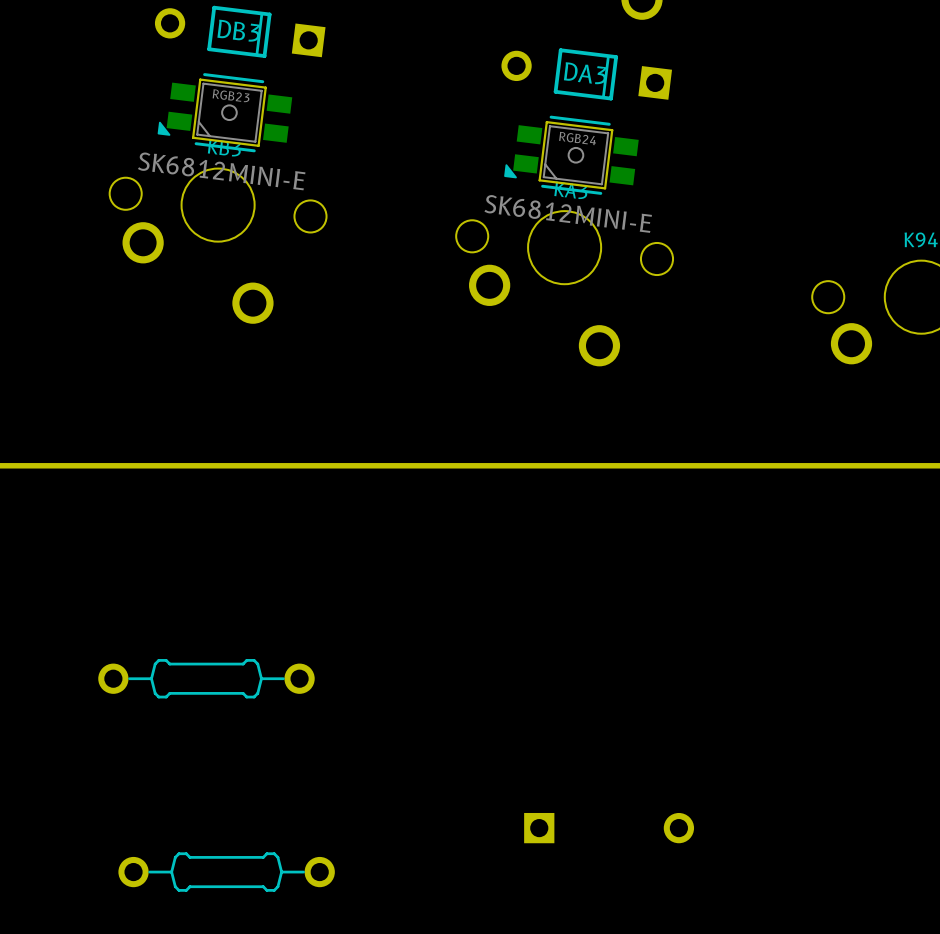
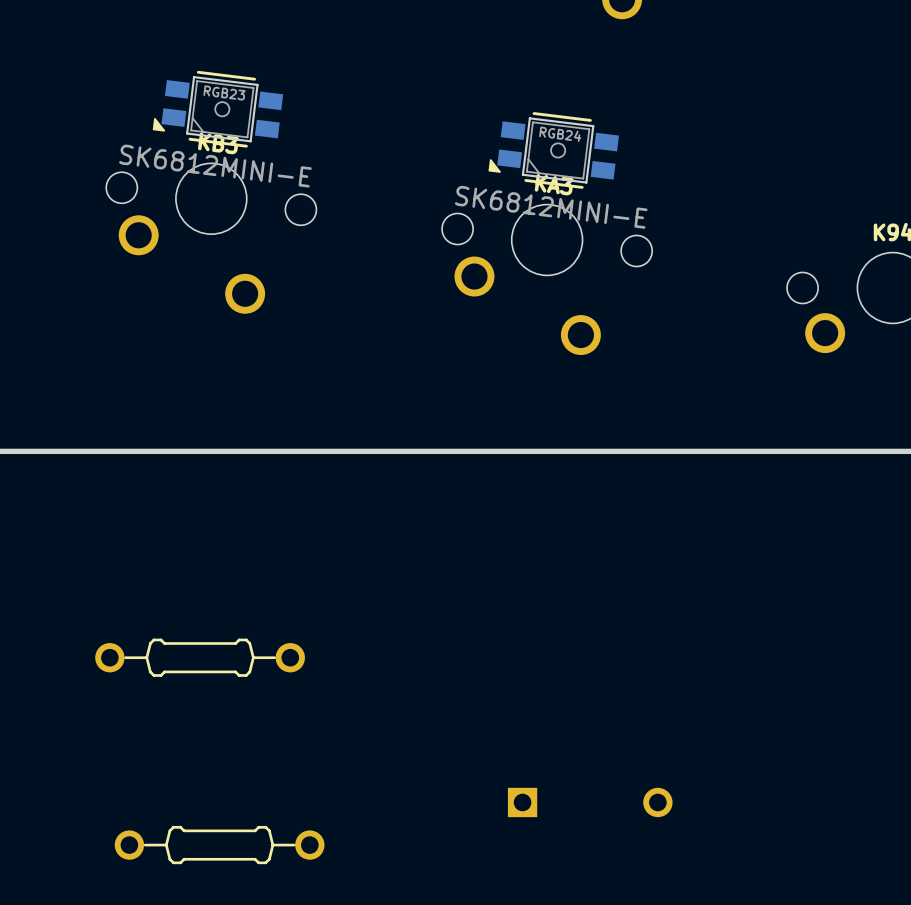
DB3: (240, 31) -> none
DA3: (586, 74) -> none

